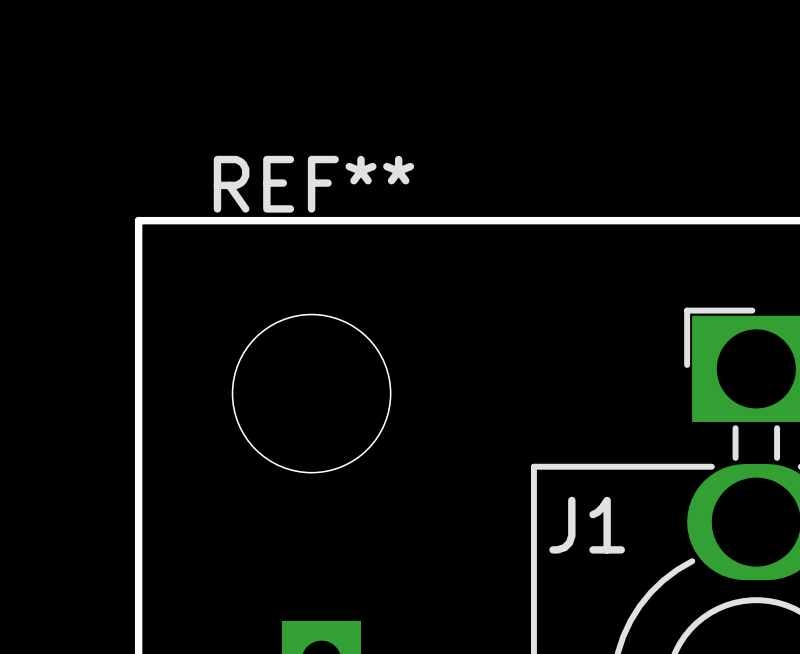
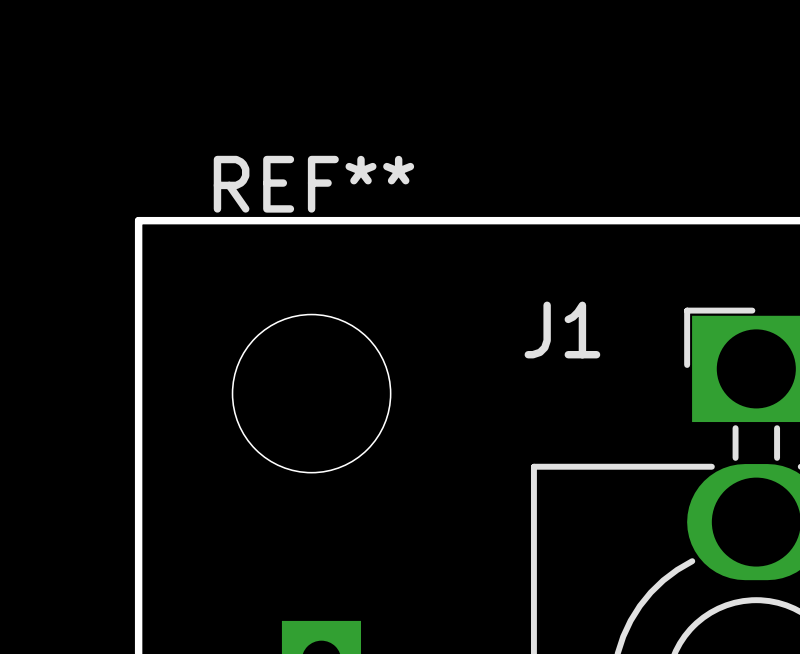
J1 name position: J1 (587, 525) -> J1 (562, 330)

